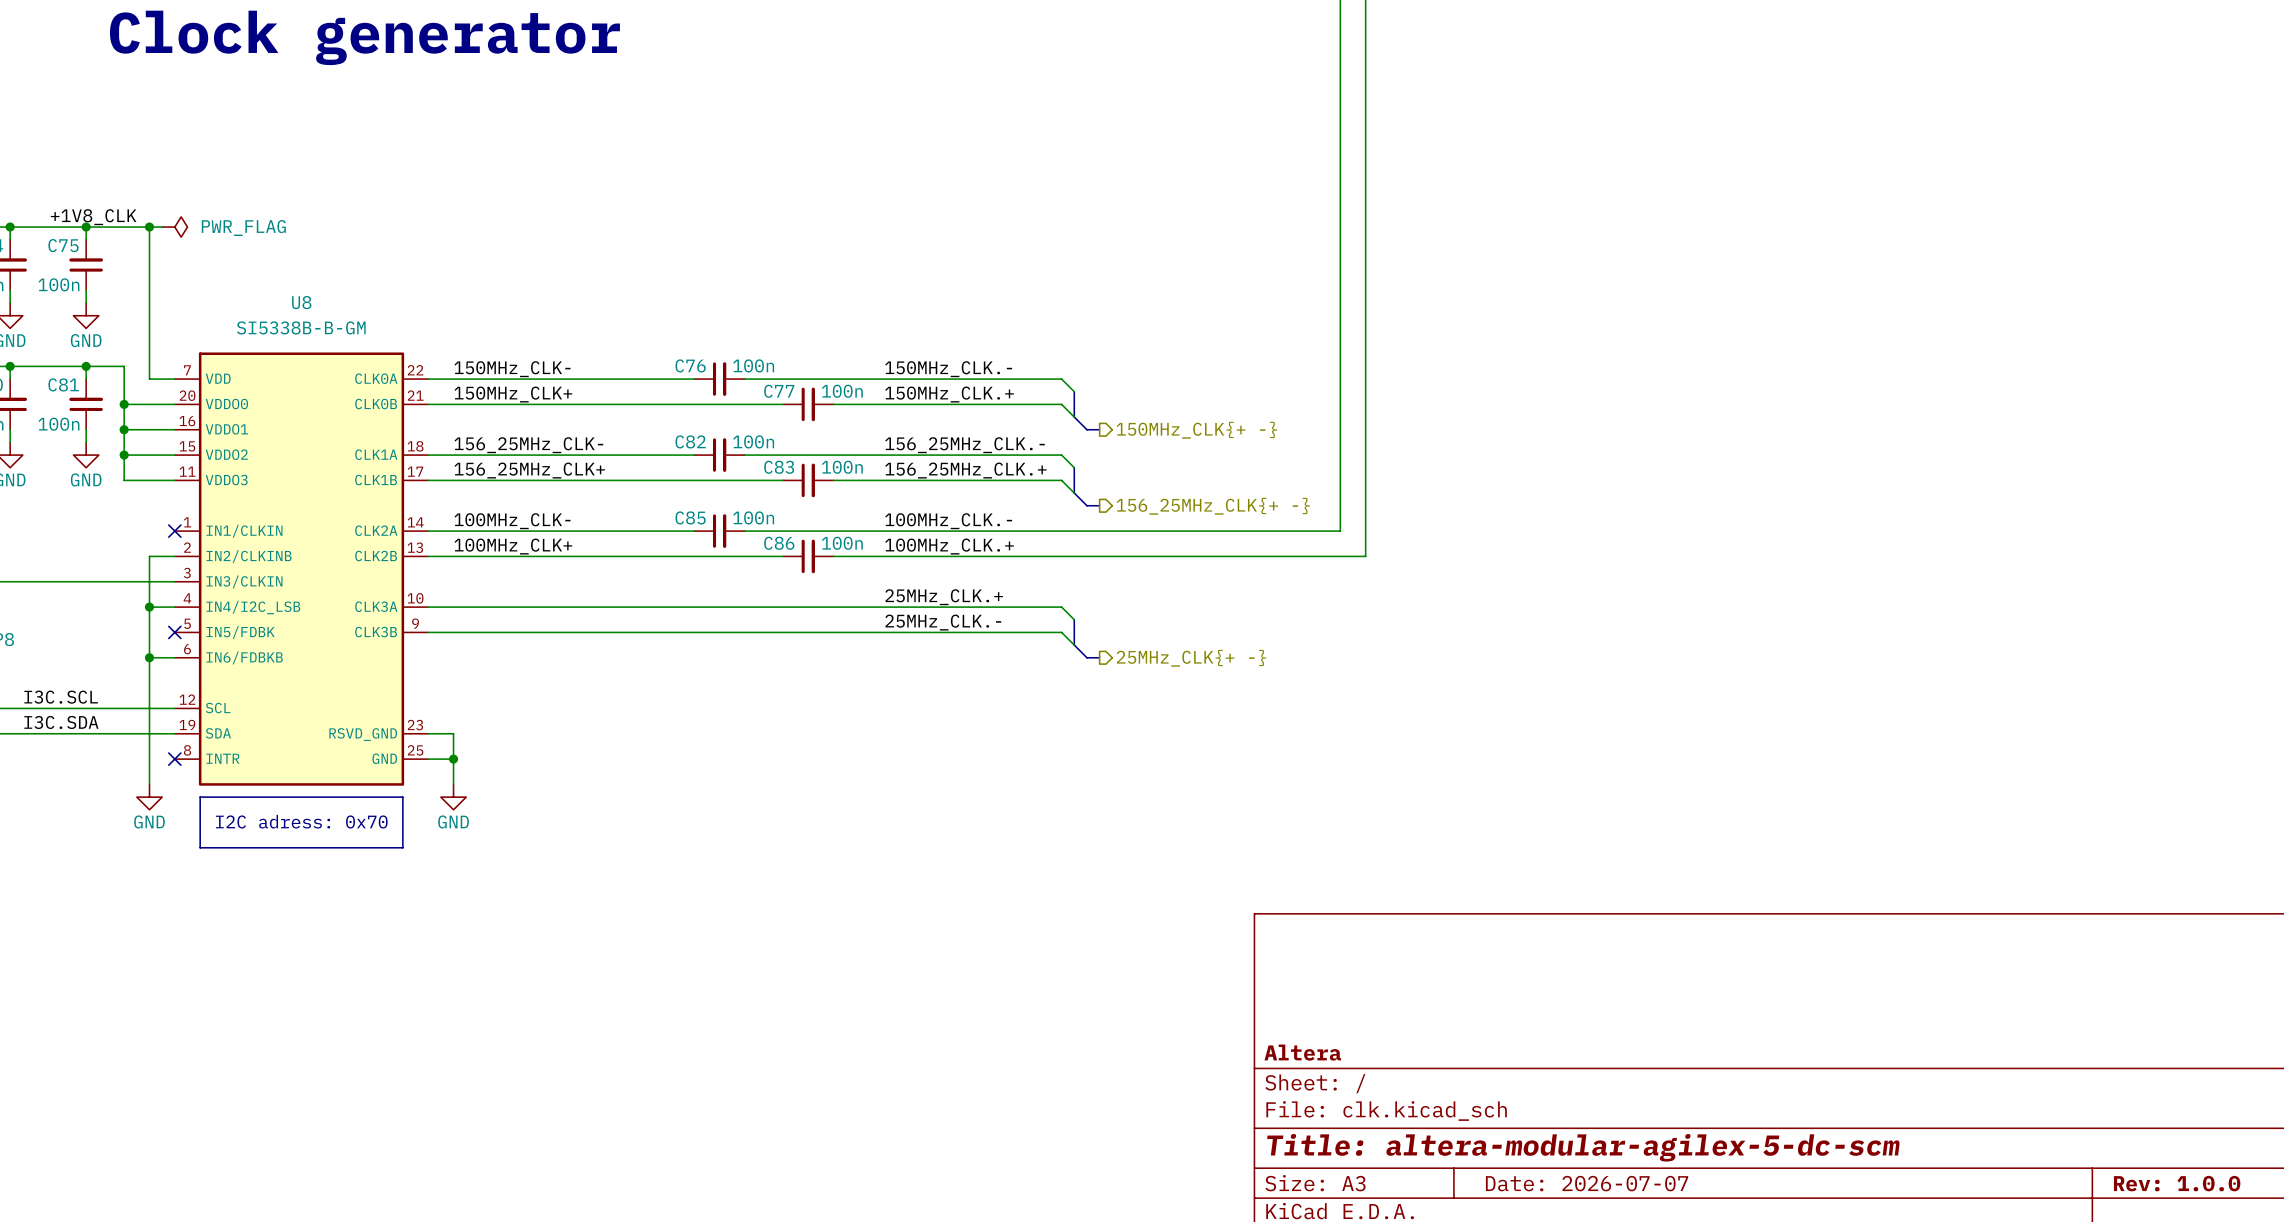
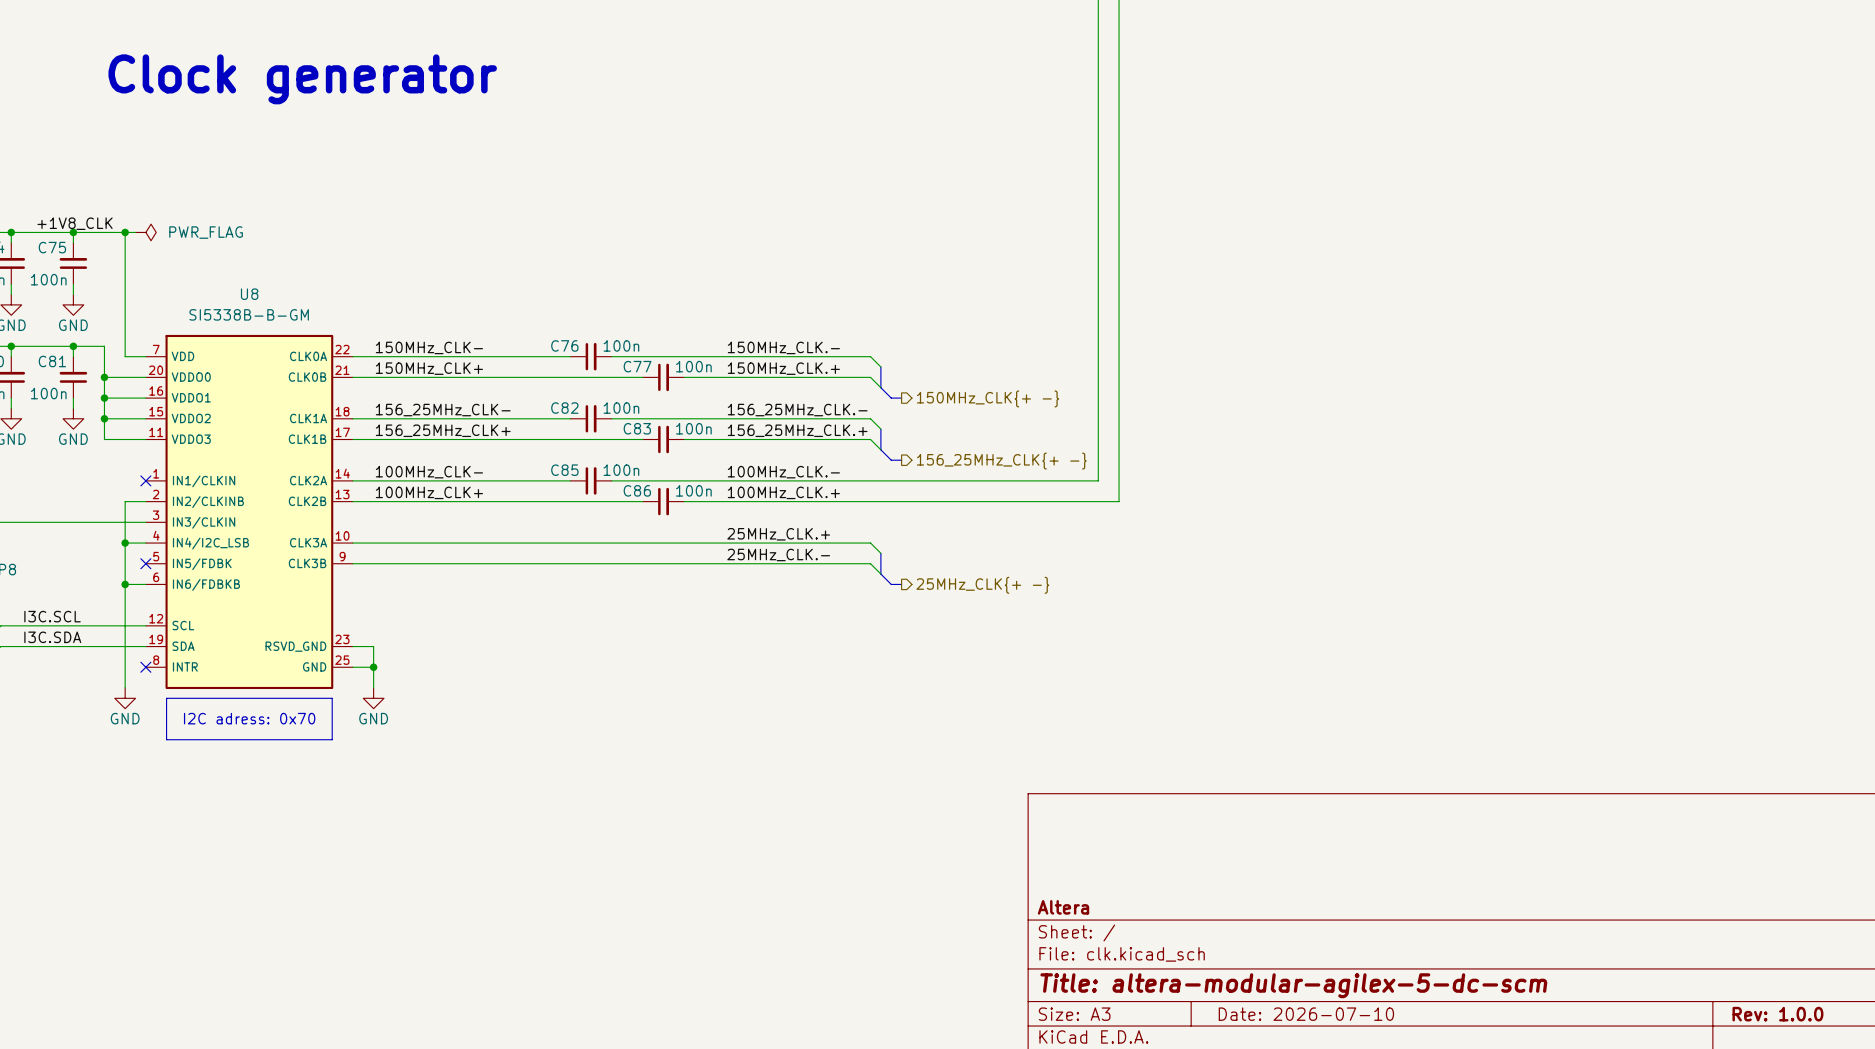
title block: Date: 2026-07-07 (1587, 1183) -> Date: 2026-07-10 (1306, 1014)

